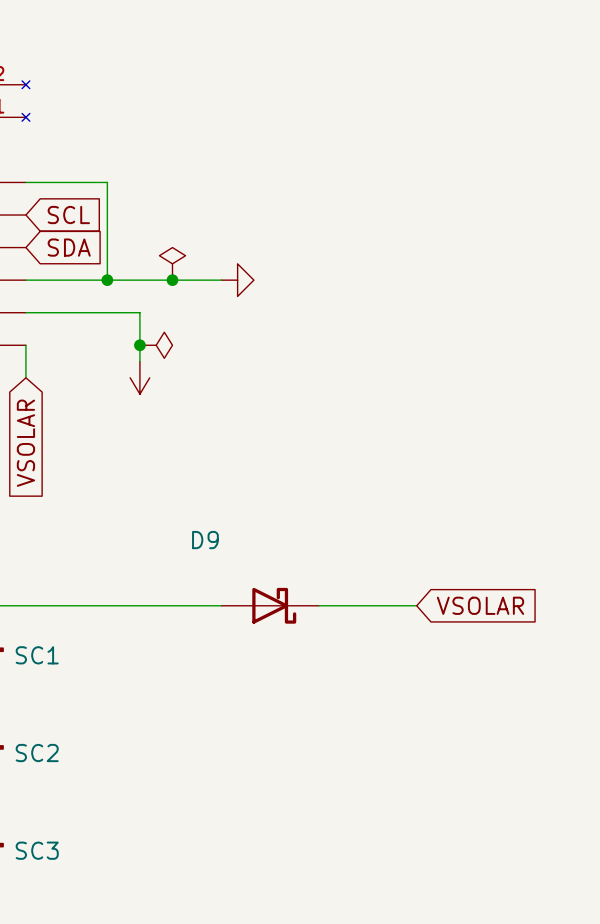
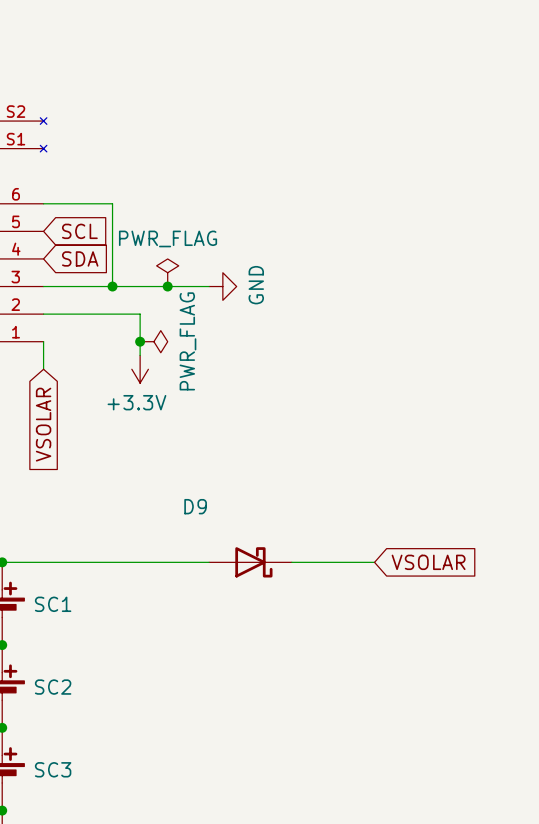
power symbol text: none -> PWR_FLAG (168, 238)
power symbol text: none -> GND (256, 285)
power symbol text: none -> PWR_FLAG (187, 341)
power symbol text: none -> +3.3V (136, 402)

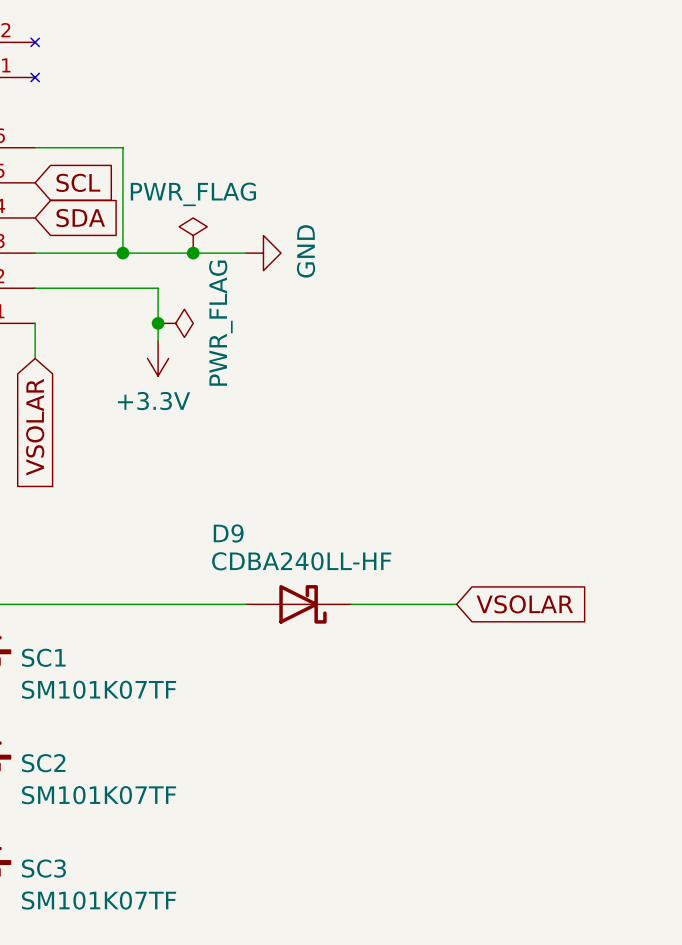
D9 value: none -> CDBA240LL-HF (301, 561)
SC1 value: none -> SM101K07TF (99, 689)
SC2 value: none -> SM101K07TF (99, 795)
SC3 value: none -> SM101K07TF (99, 900)

